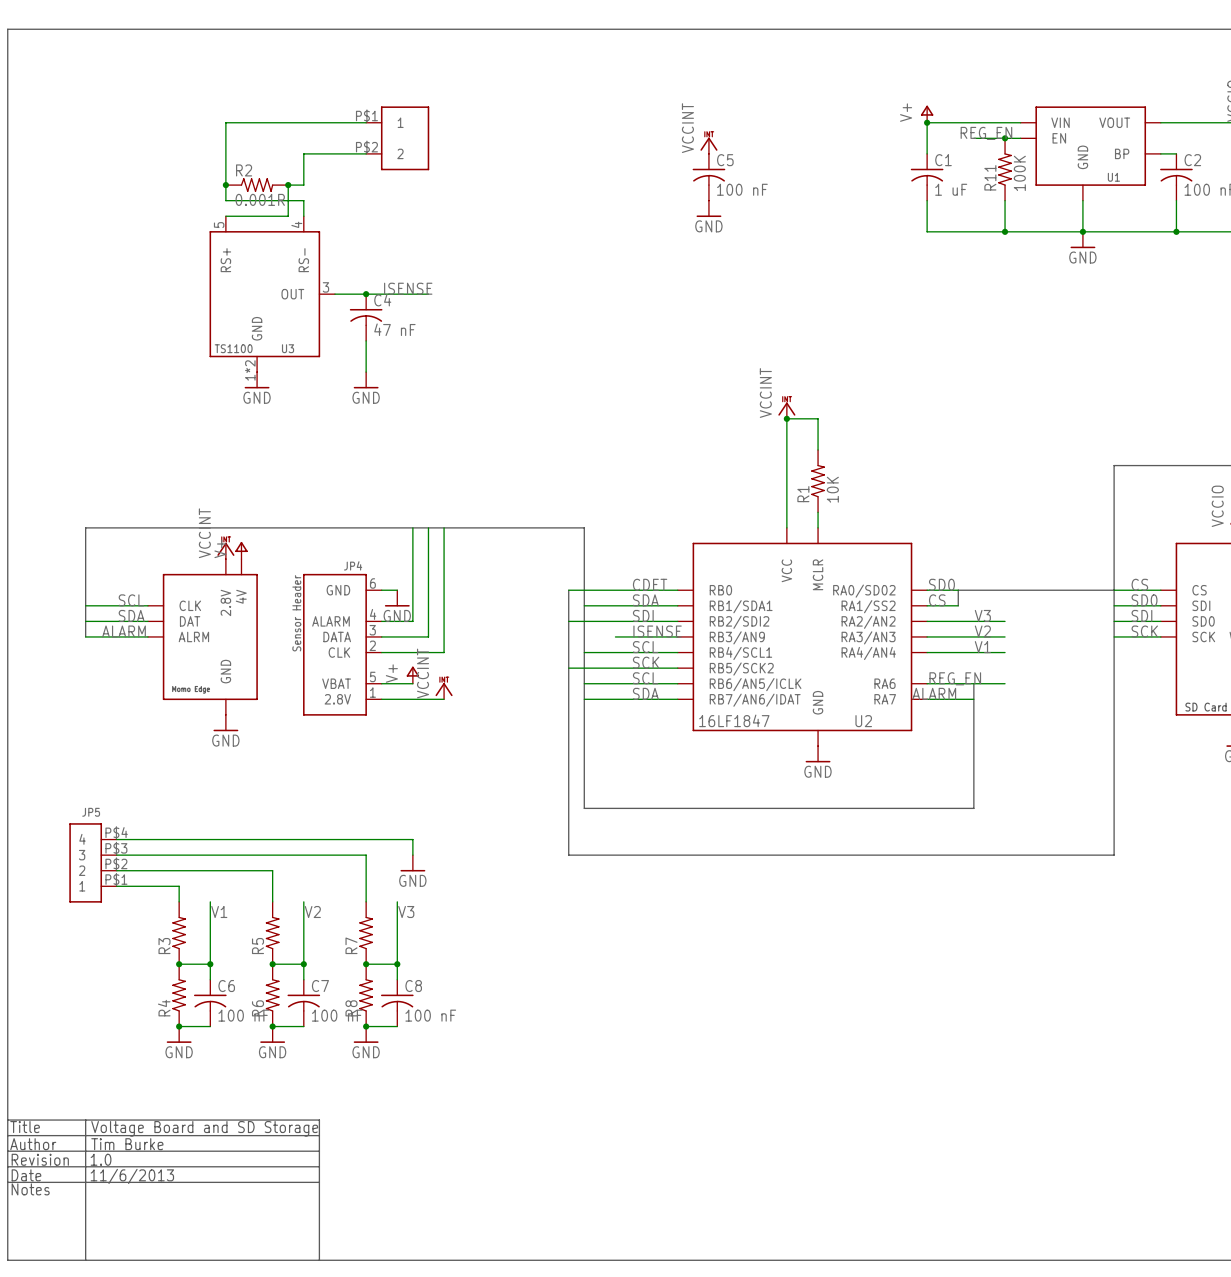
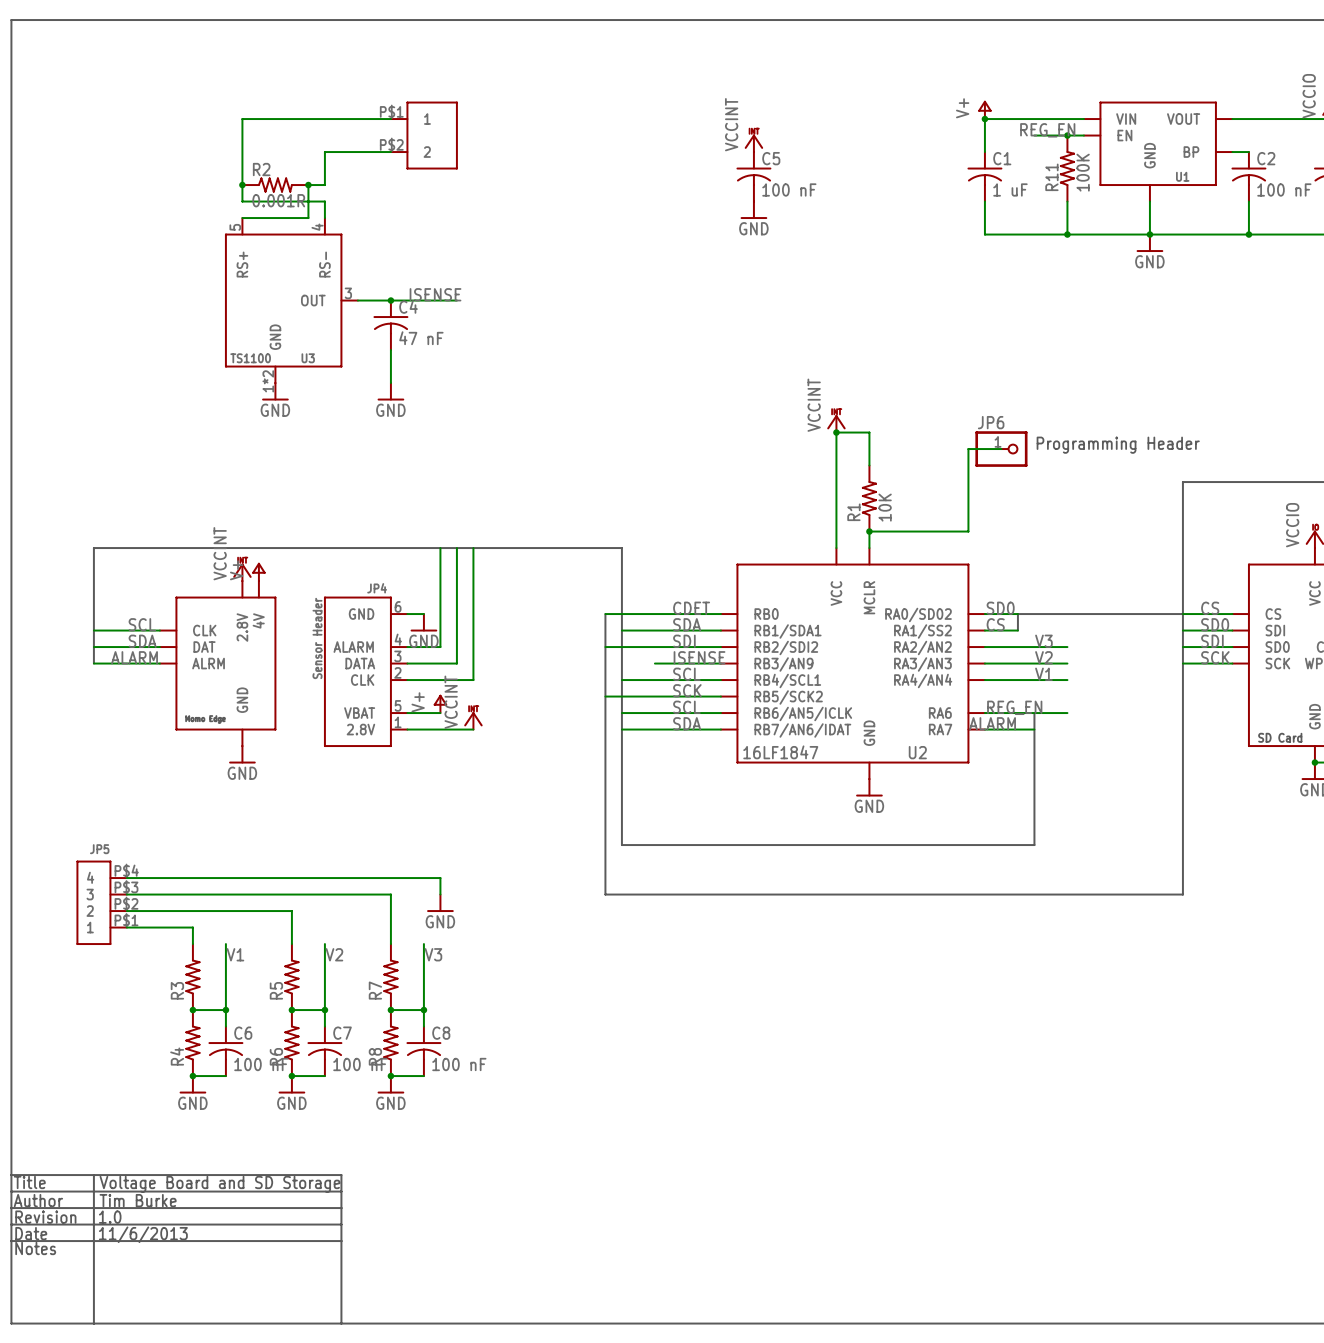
text: none -> Programming Header (1118, 445)
wire: none -> (1001, 449) (968, 449) (968, 531) (869, 531)
JP6: none -> (1001, 449)
junction: none -> (869, 531)

